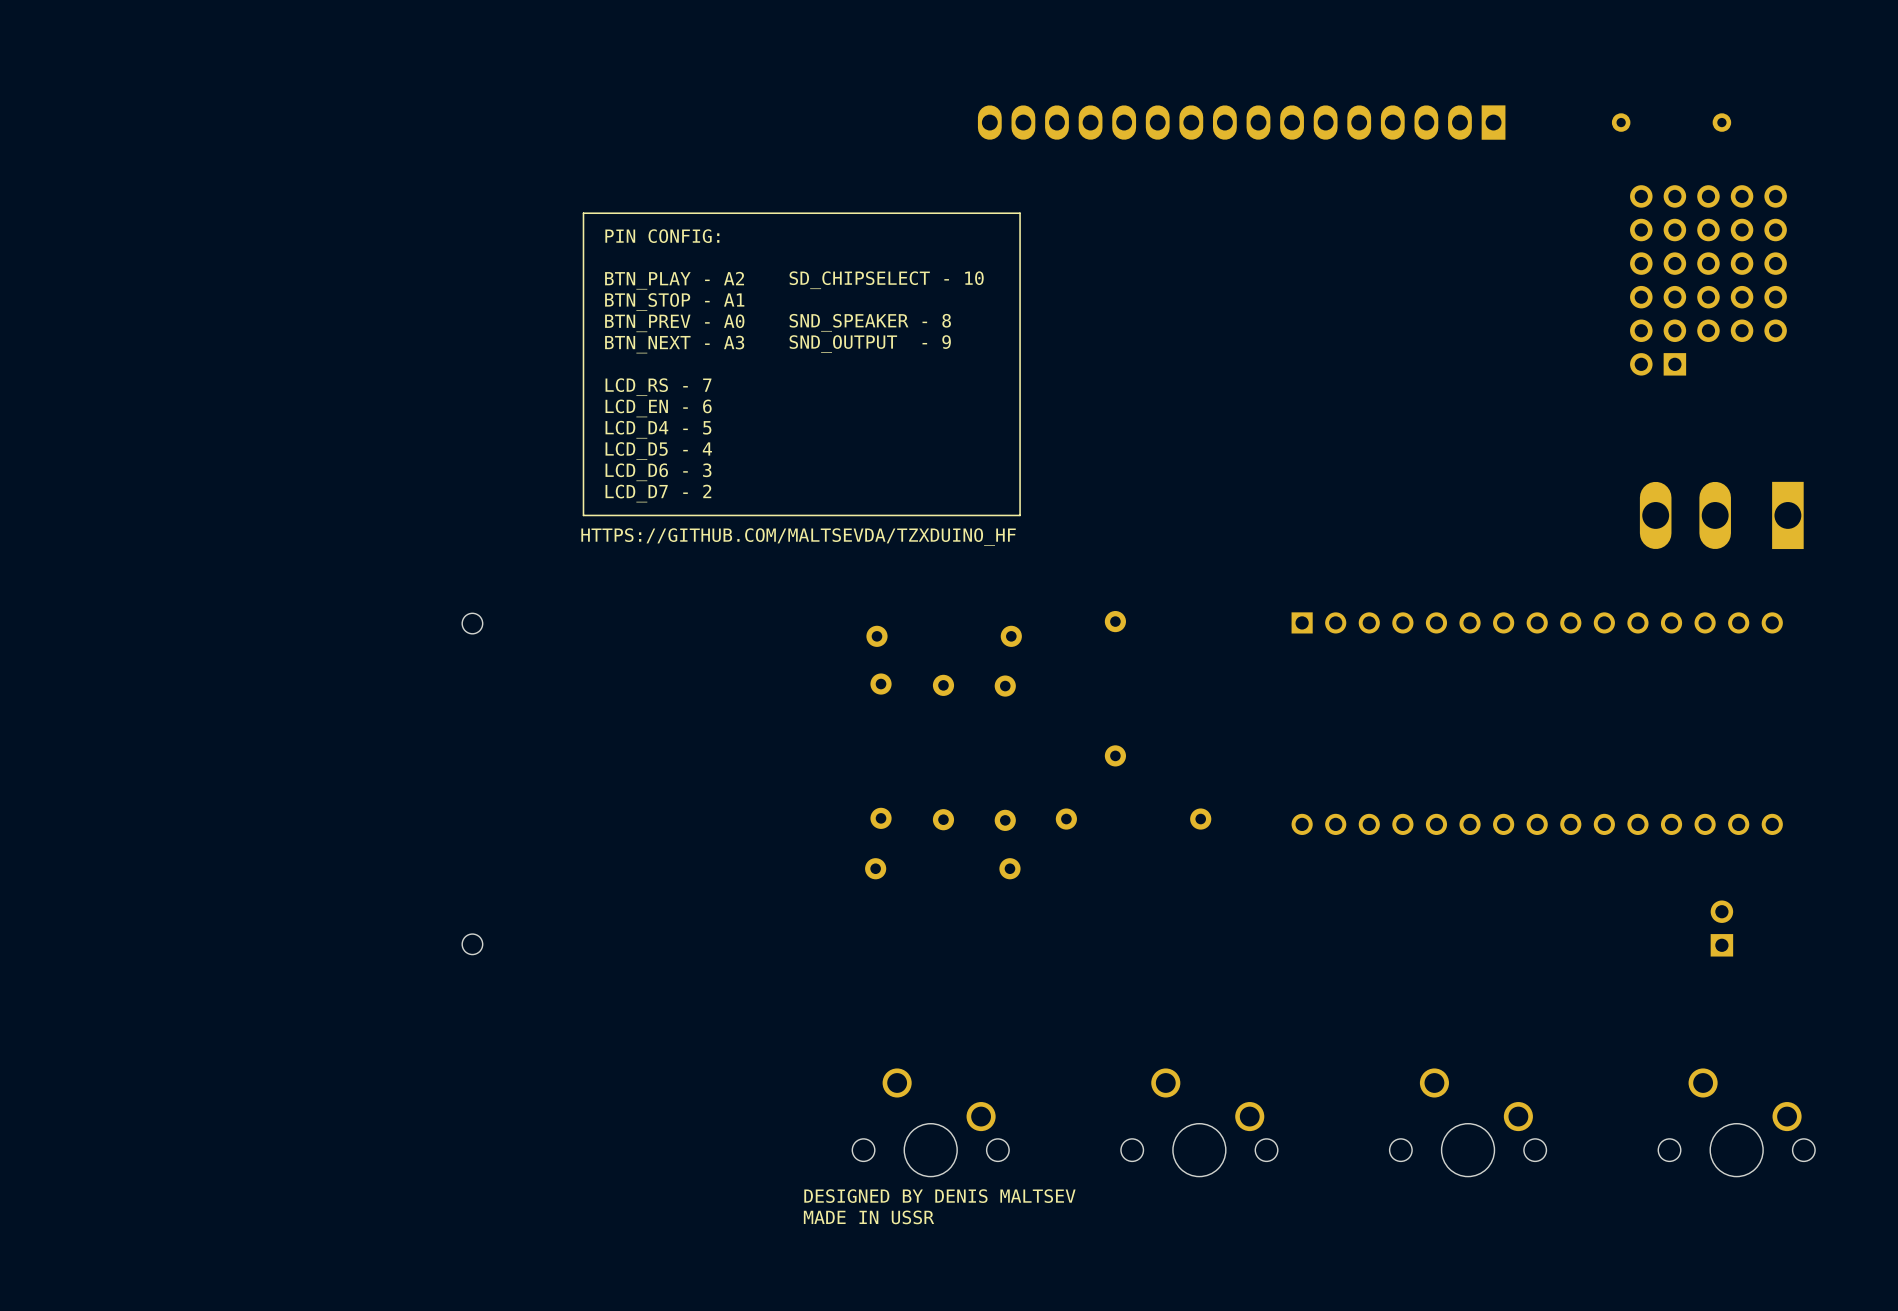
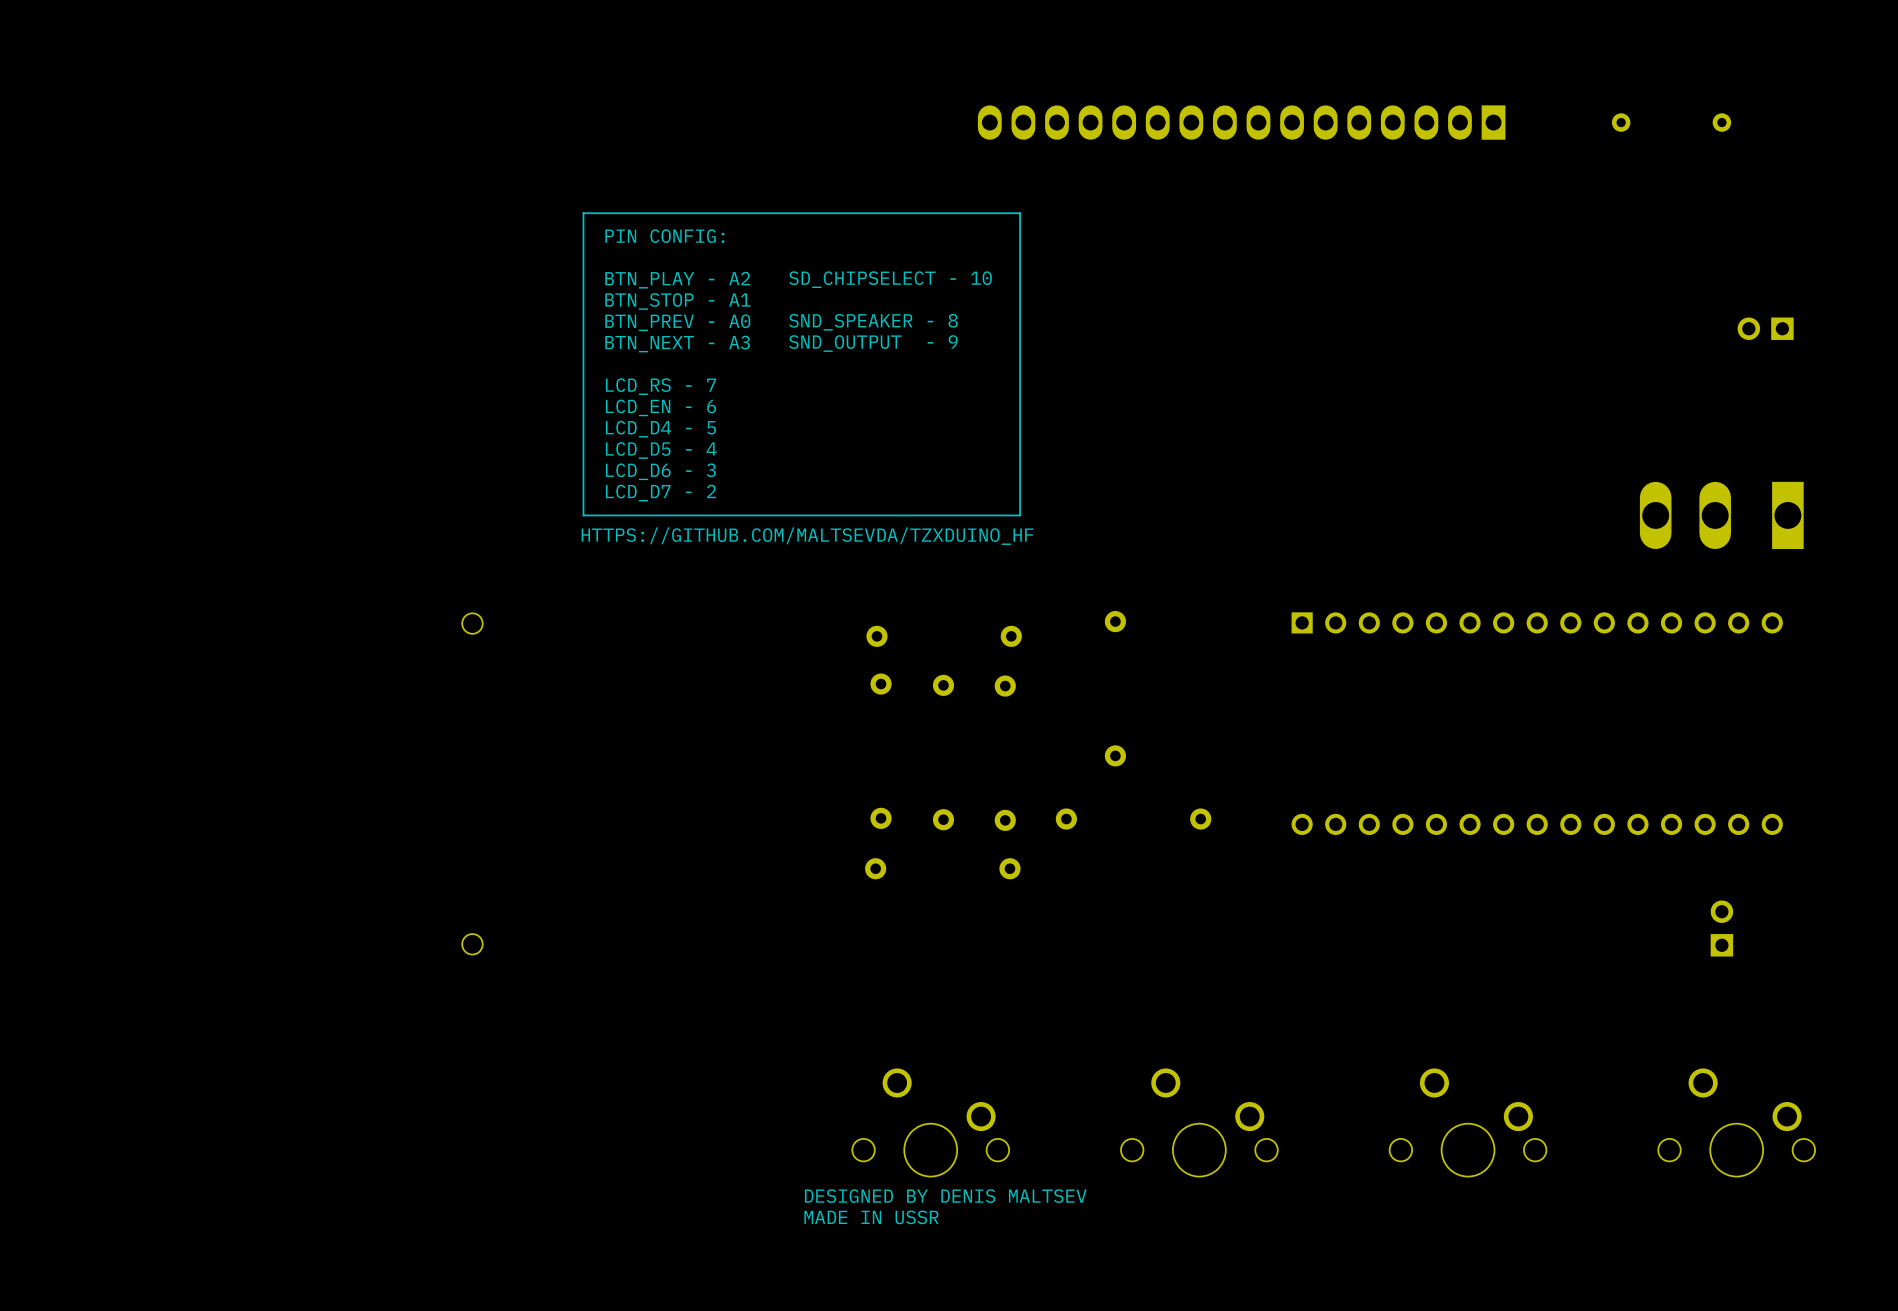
part: (1708, 263) -> none
part position: (1658, 364) -> (1765, 328)

